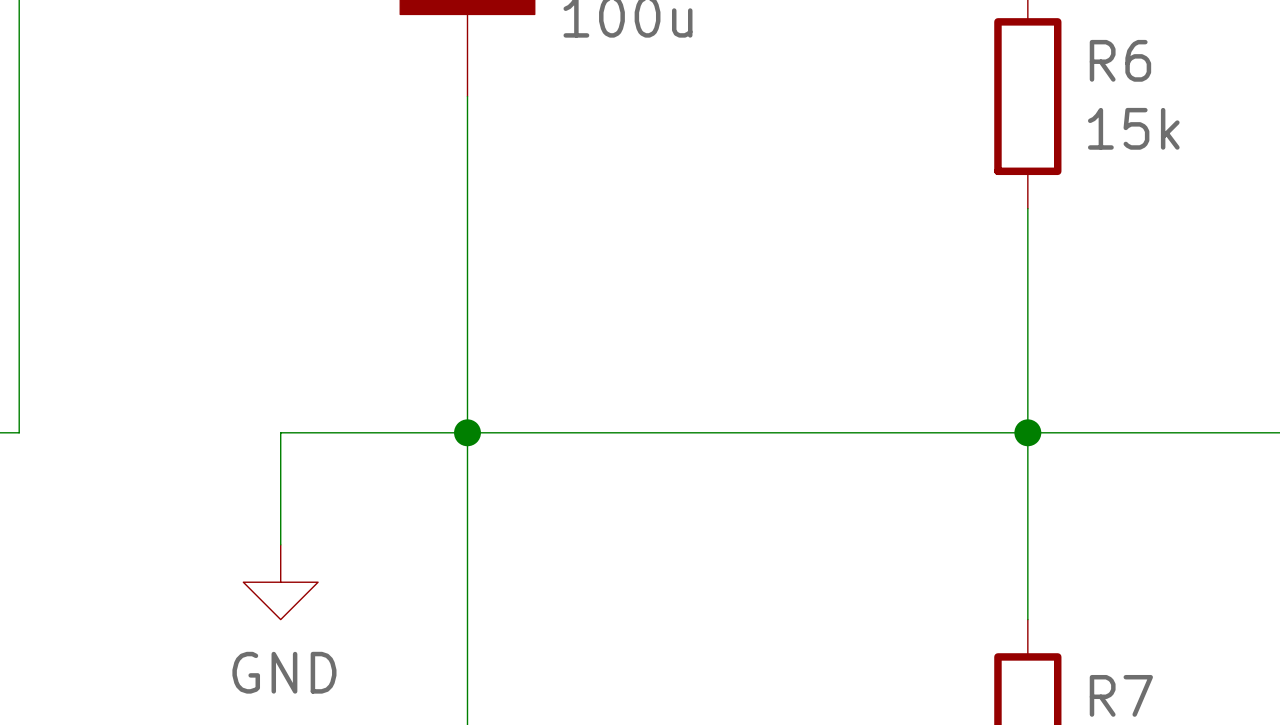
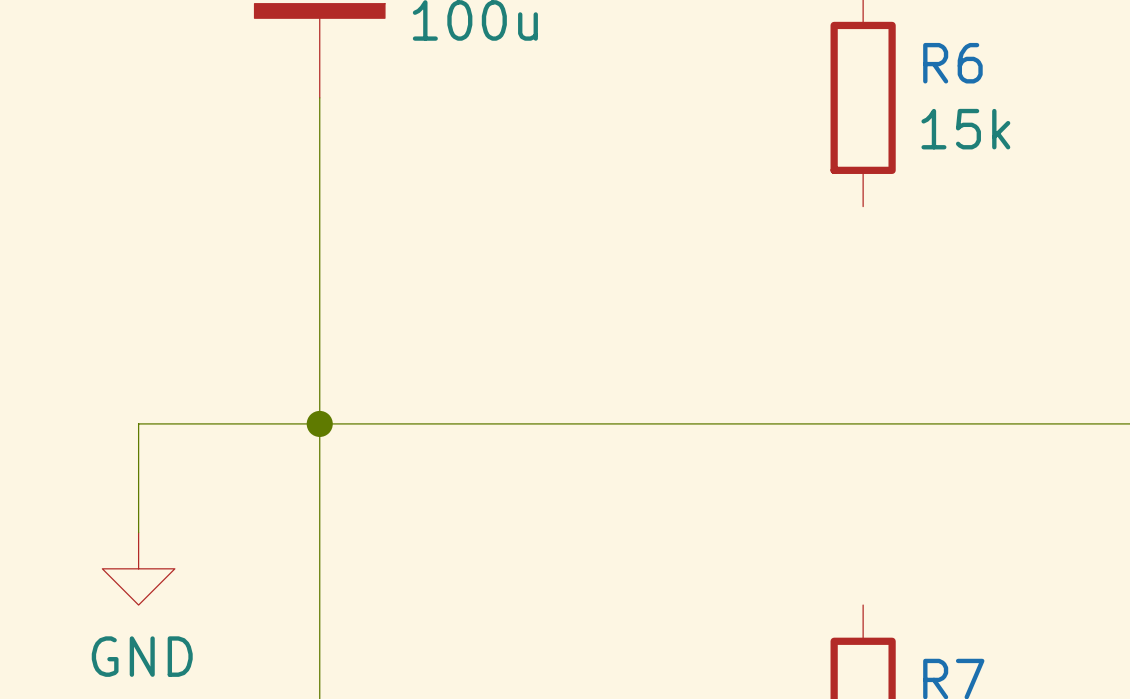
wire: (1027, 208) (1027, 619) -> none
junction: (1027, 432) -> none

